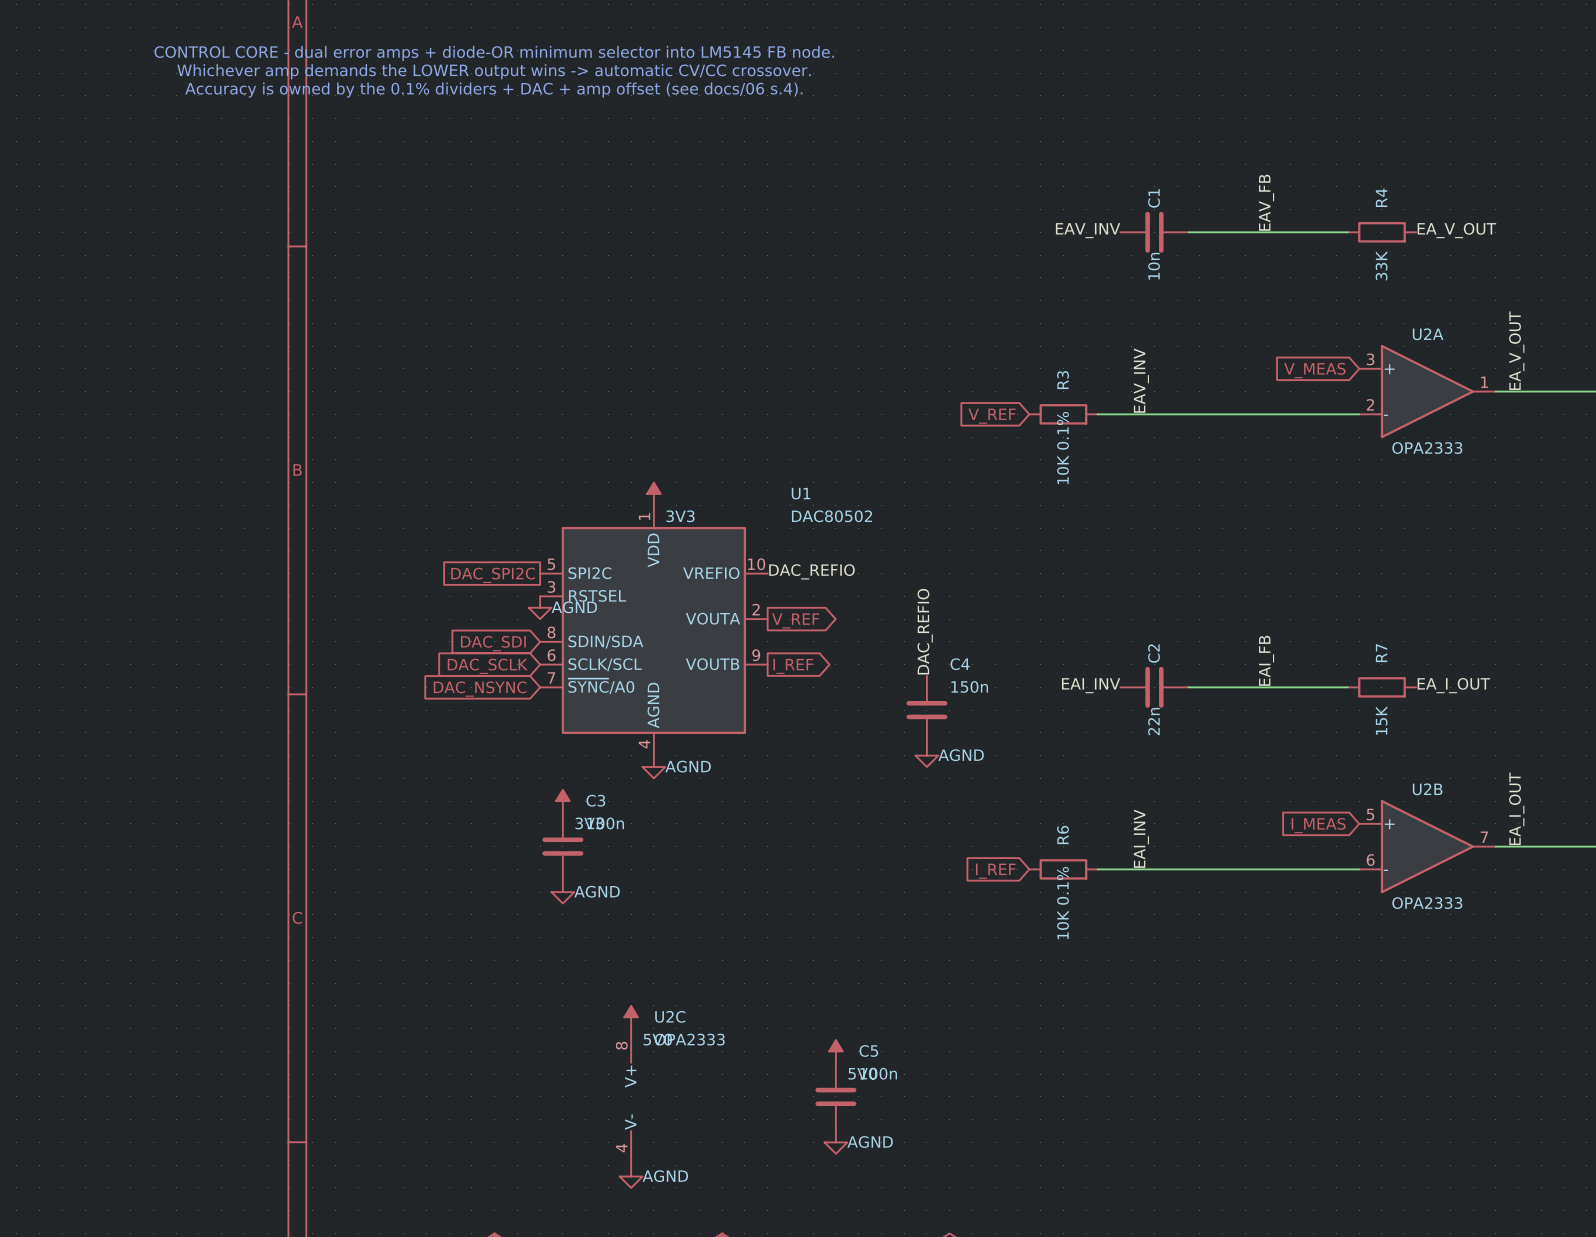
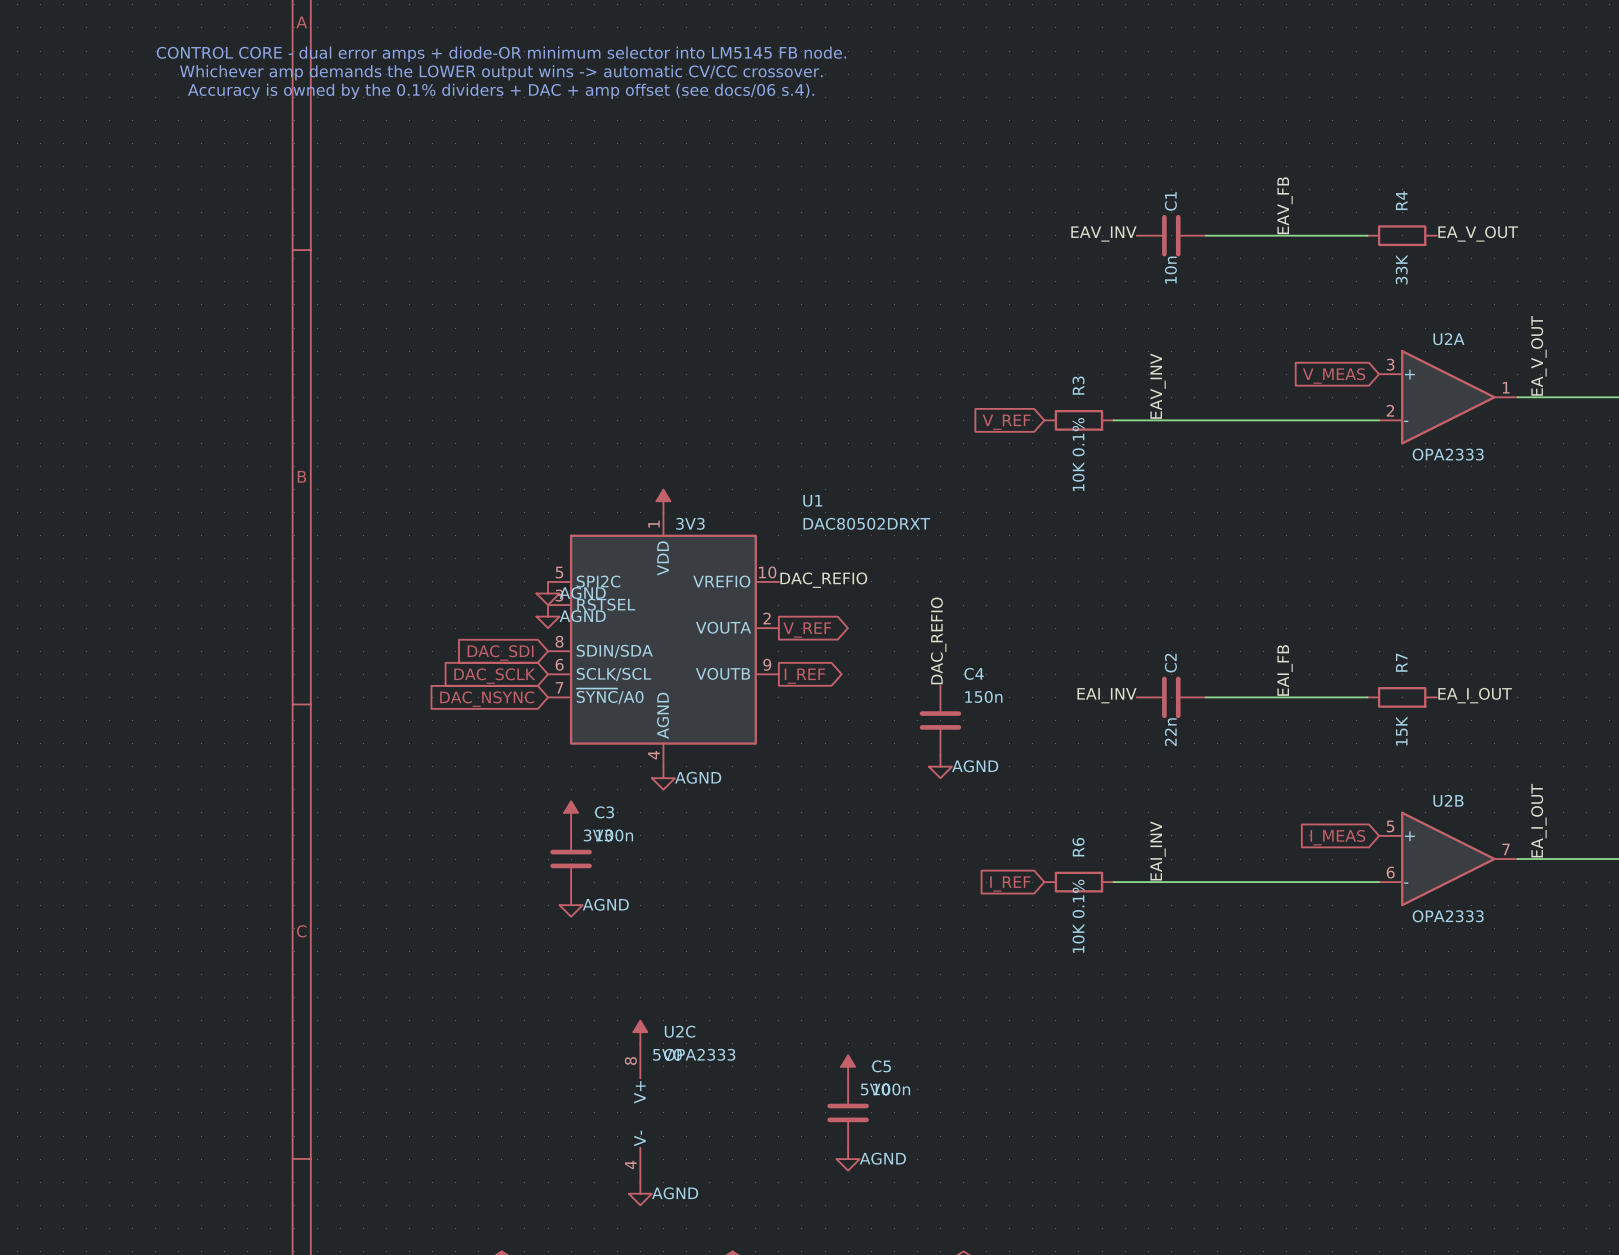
U1 value: DAC80502 (832, 516) -> DAC80502DRXT (866, 523)
global label: DAC_SPI2C (493, 575) -> none
power symbol: none -> AGND (548, 593)

